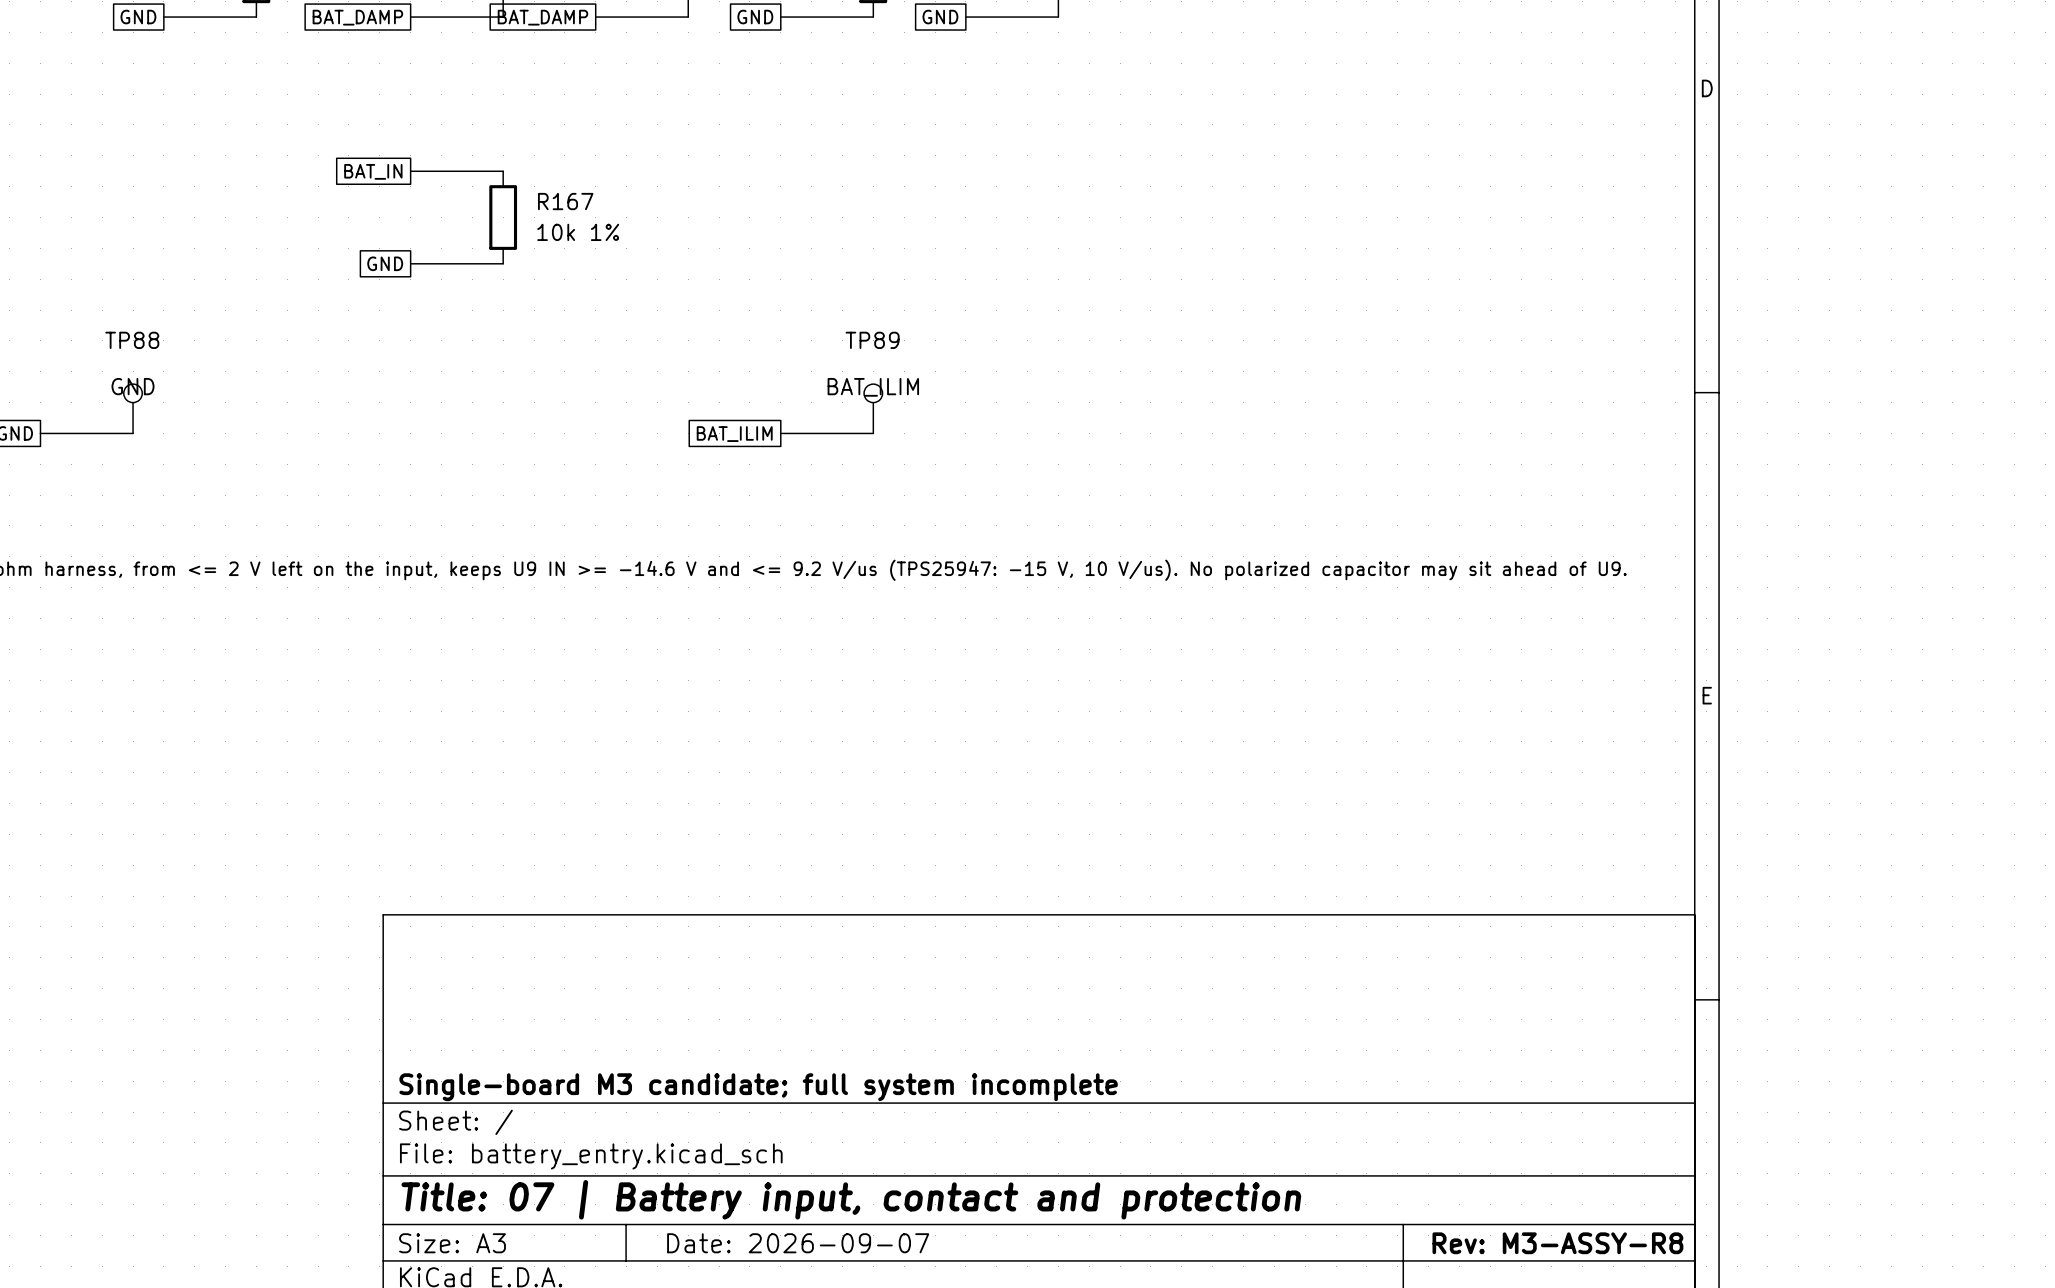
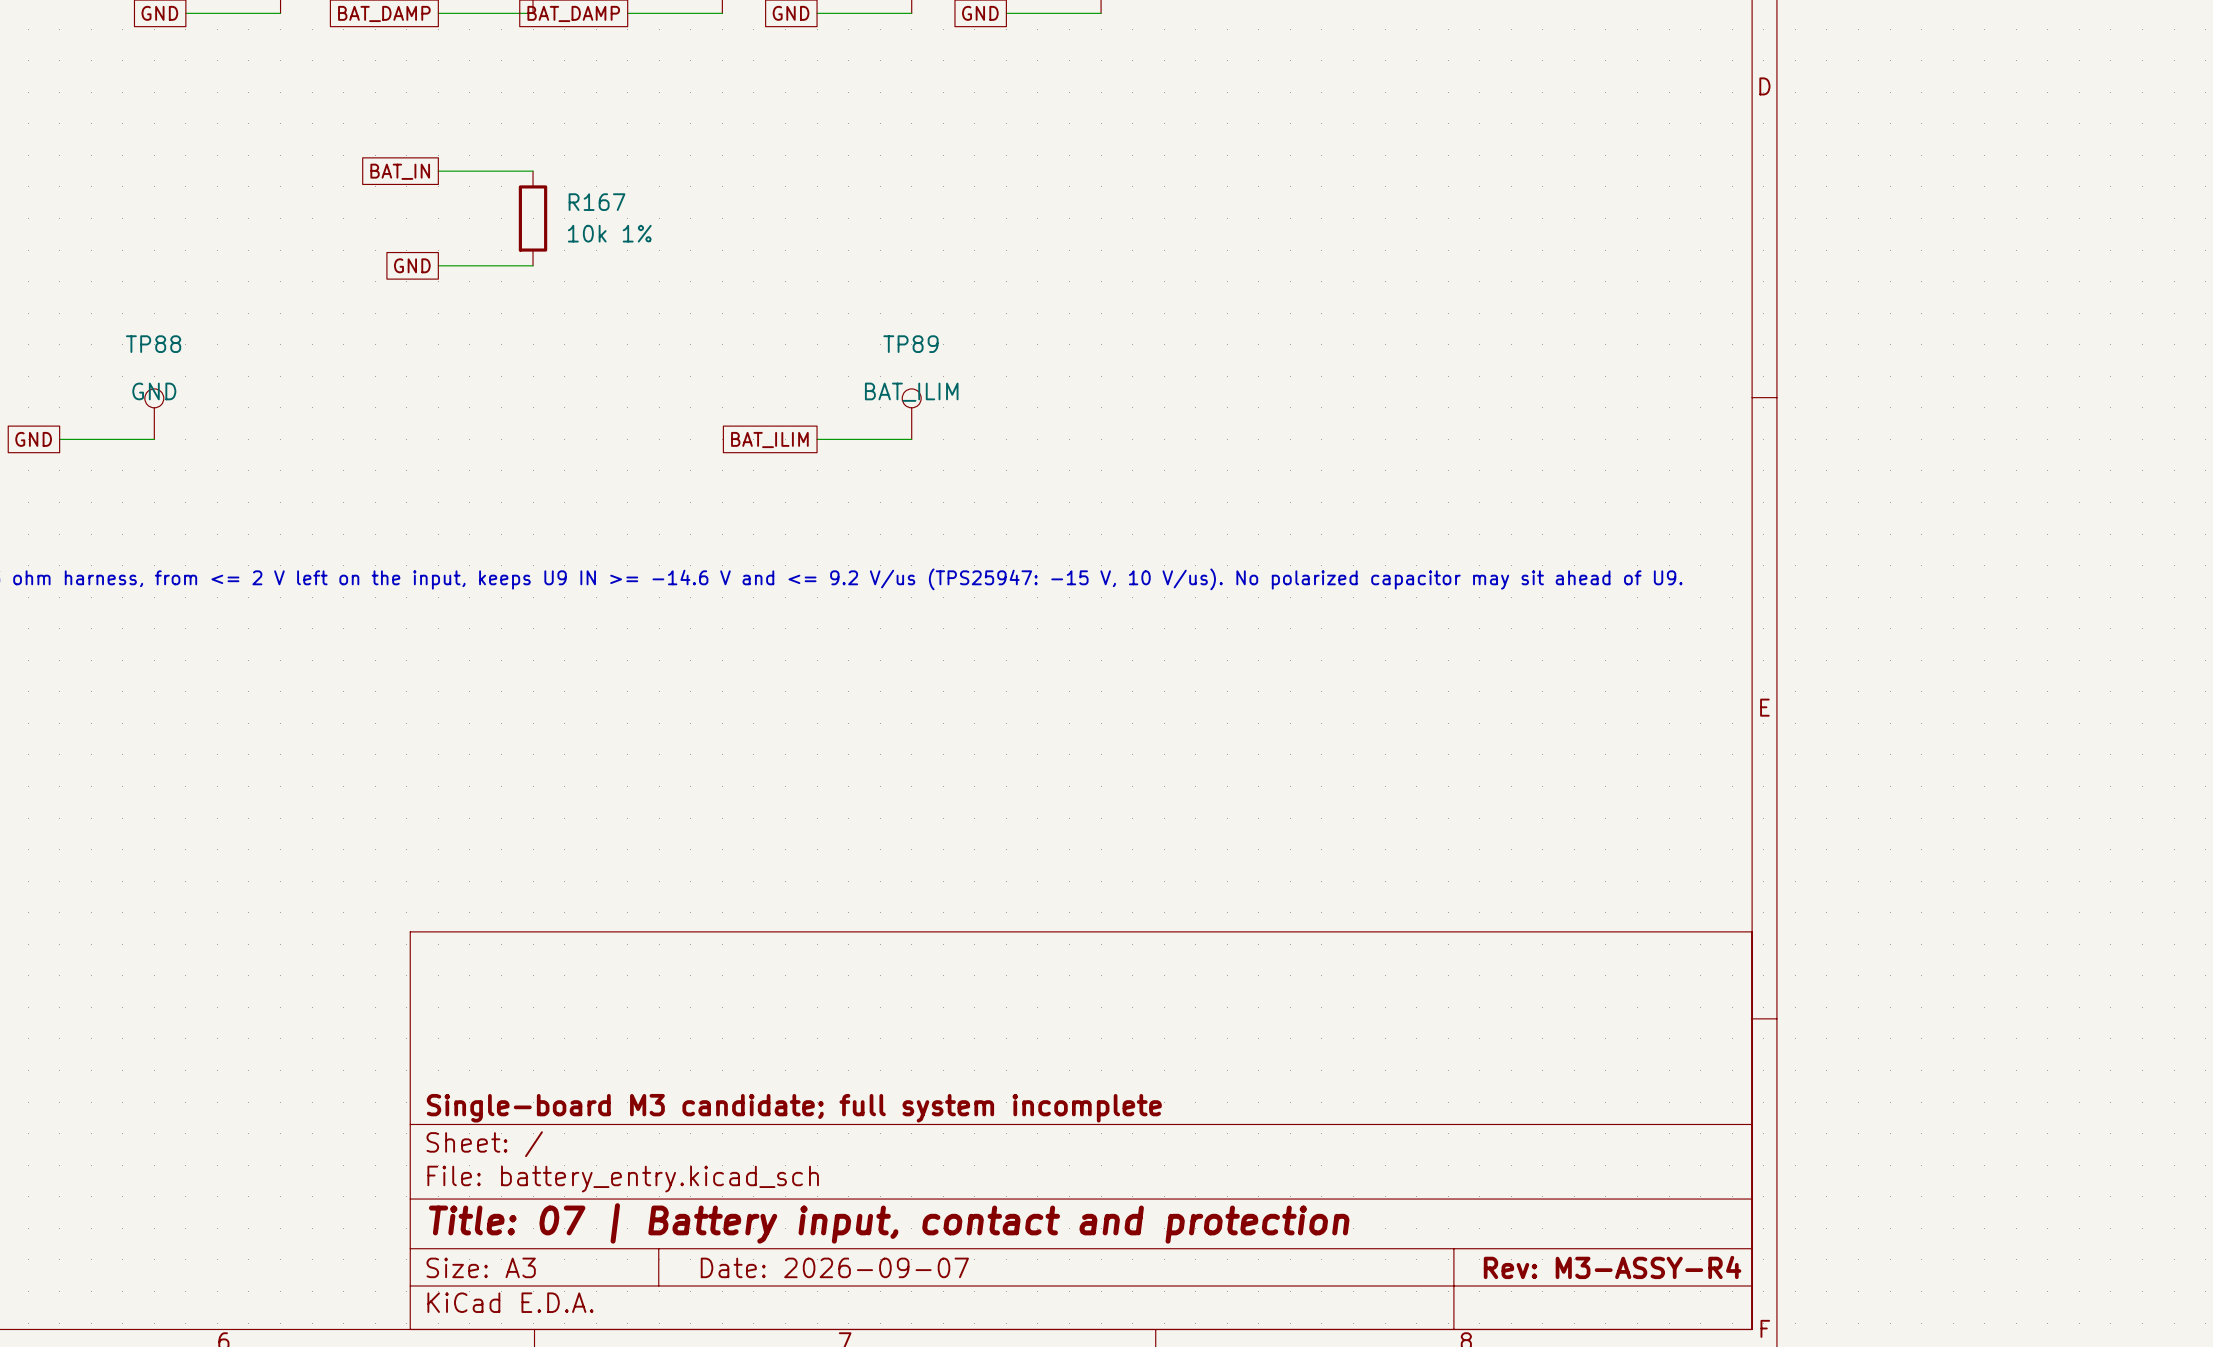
title block: Rev: M3-ASSY-R8 (1557, 1243) -> Rev: M3-ASSY-R4 (1612, 1267)

